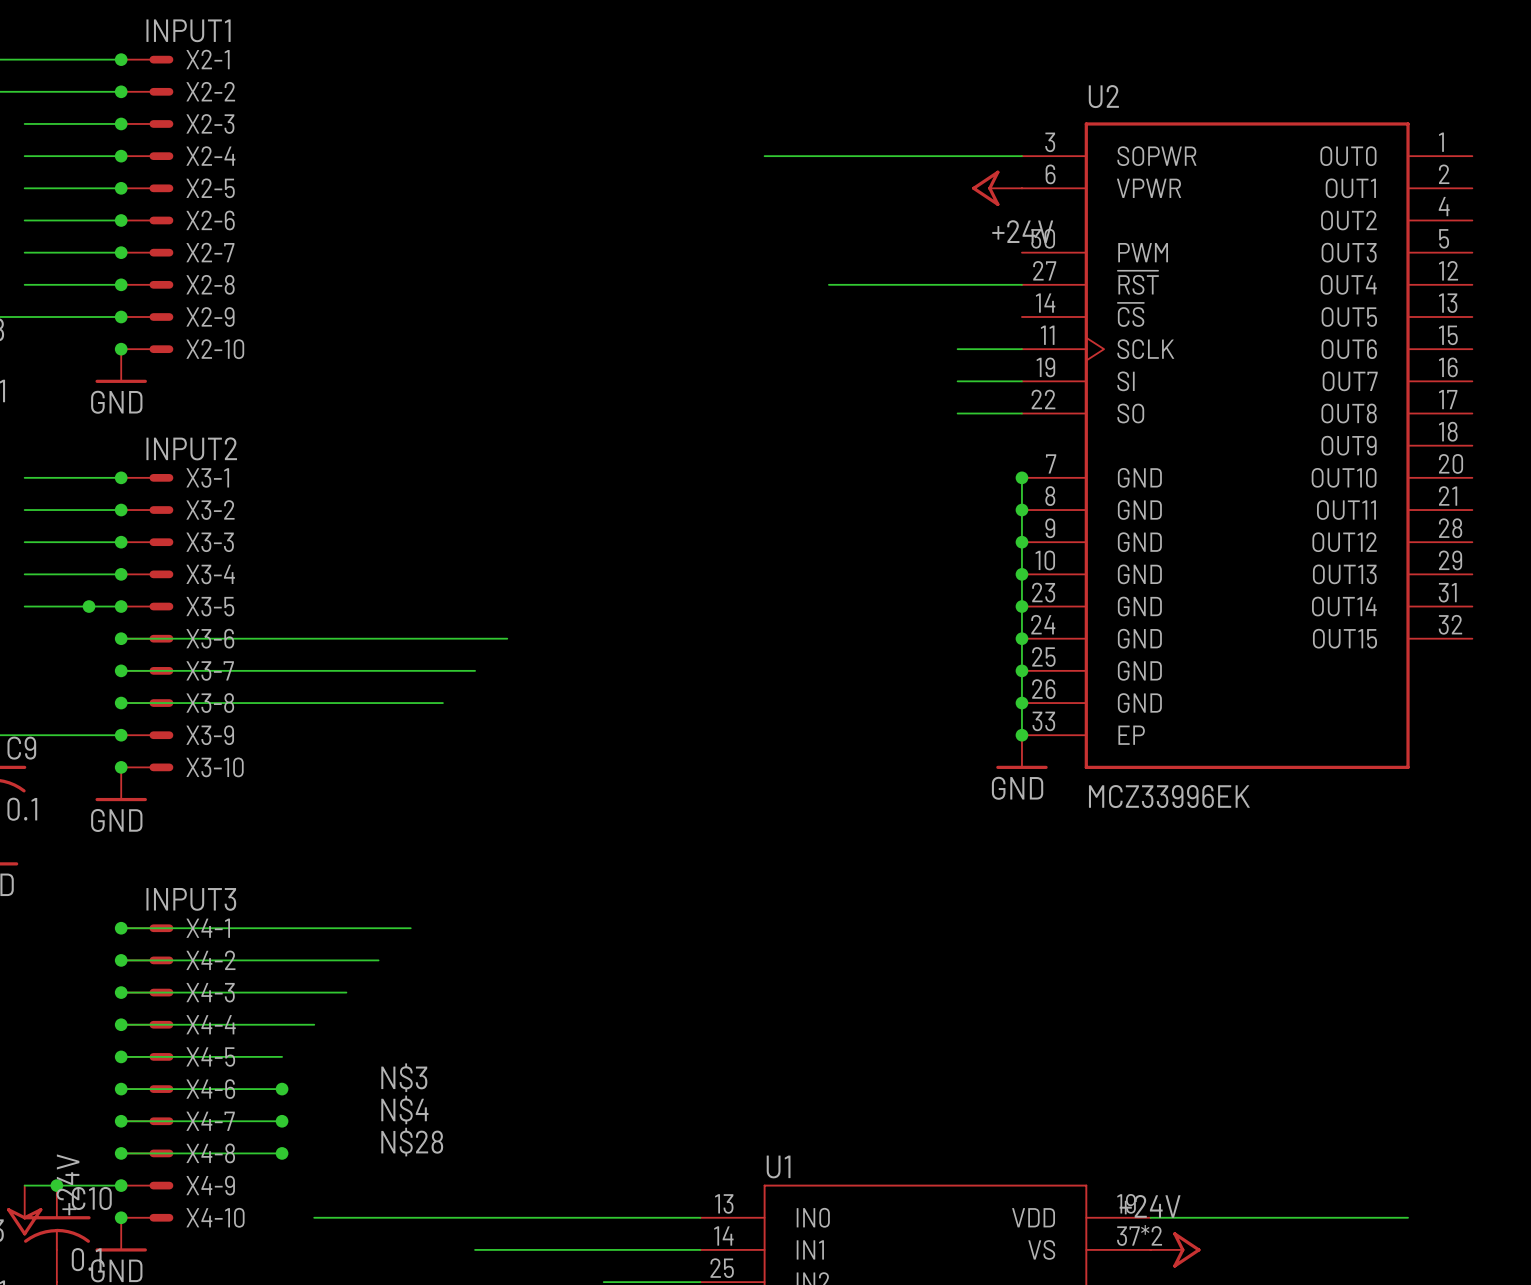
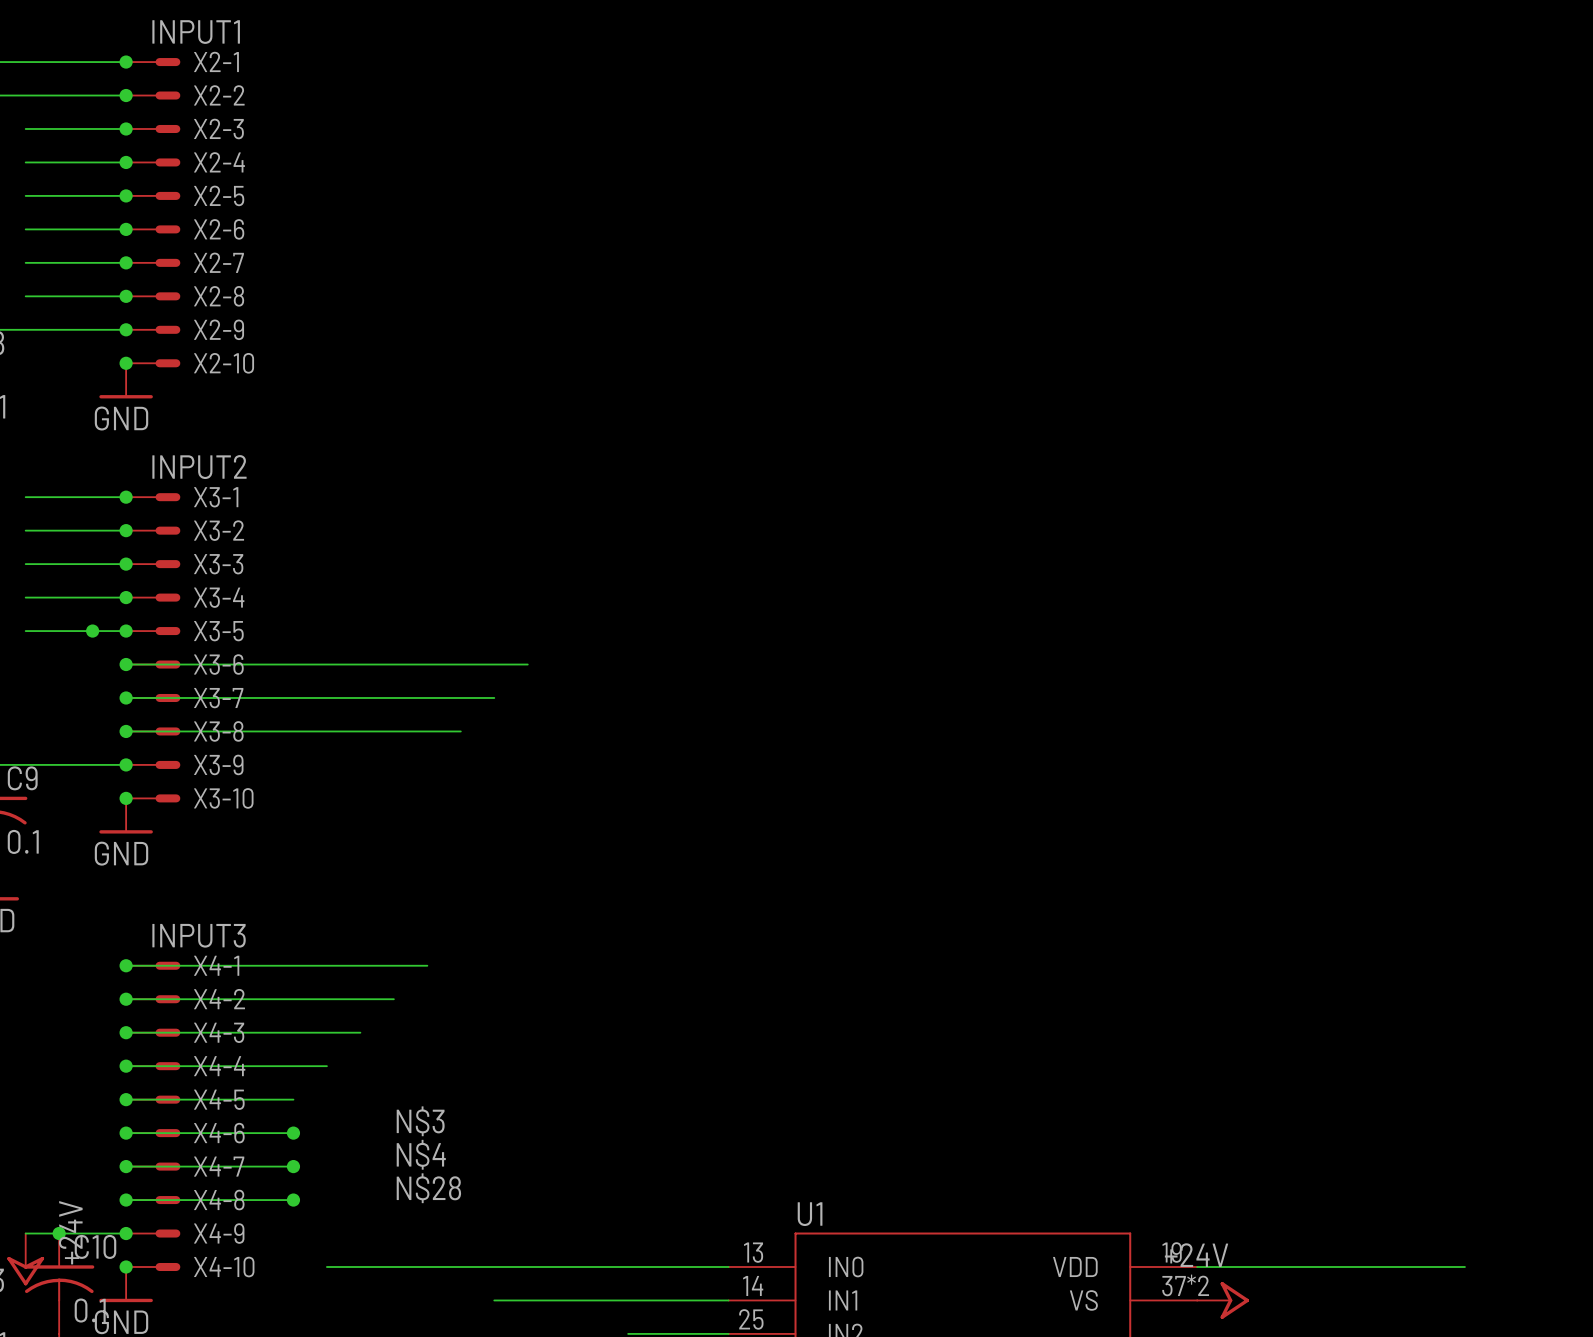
wire: (764, 156) (1021, 156) -> none
power symbol: +24V (997, 188) -> none
wire: (828, 284) (1021, 284) -> none
wire: (957, 349) (1021, 349) -> none
wire: (957, 381) (1021, 381) -> none
wire: (957, 413) (1021, 413) -> none
U2: MCZ33996EK (1247, 445) -> none
wire: (1021, 477) (1021, 735) -> none
junction: (1021, 477) -> none
junction: (1021, 510) -> none
junction: (1021, 542) -> none
junction: (1021, 574) -> none
junction: (1021, 606) -> none
junction: (1021, 638) -> none
junction: (1021, 670) -> none
junction: (1021, 703) -> none
junction: (1021, 735) -> none
power symbol: GND (1021, 752) -> none

